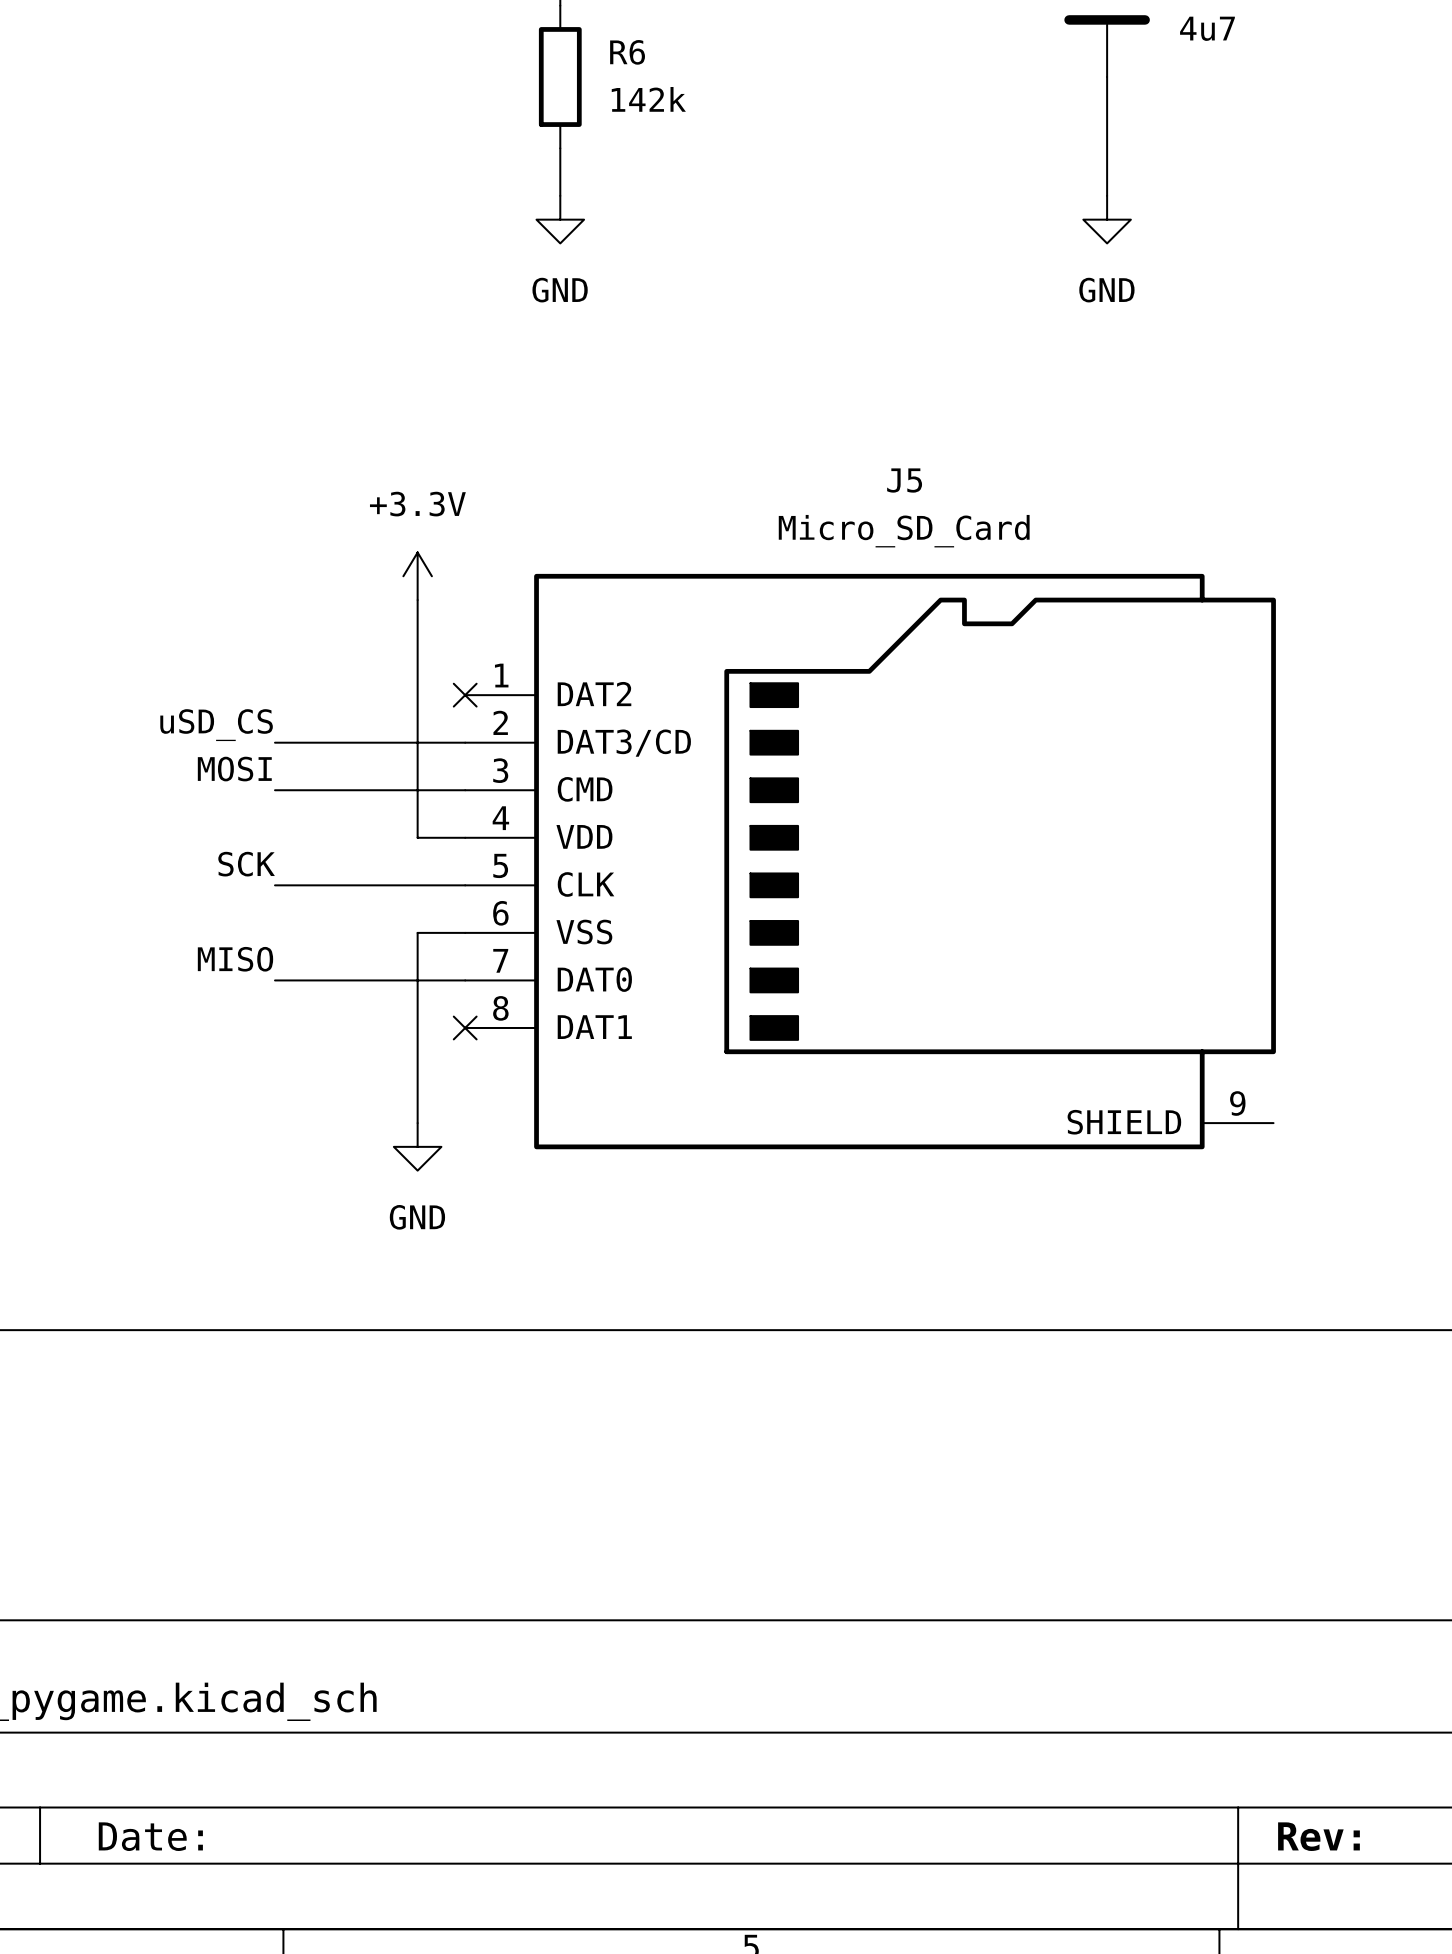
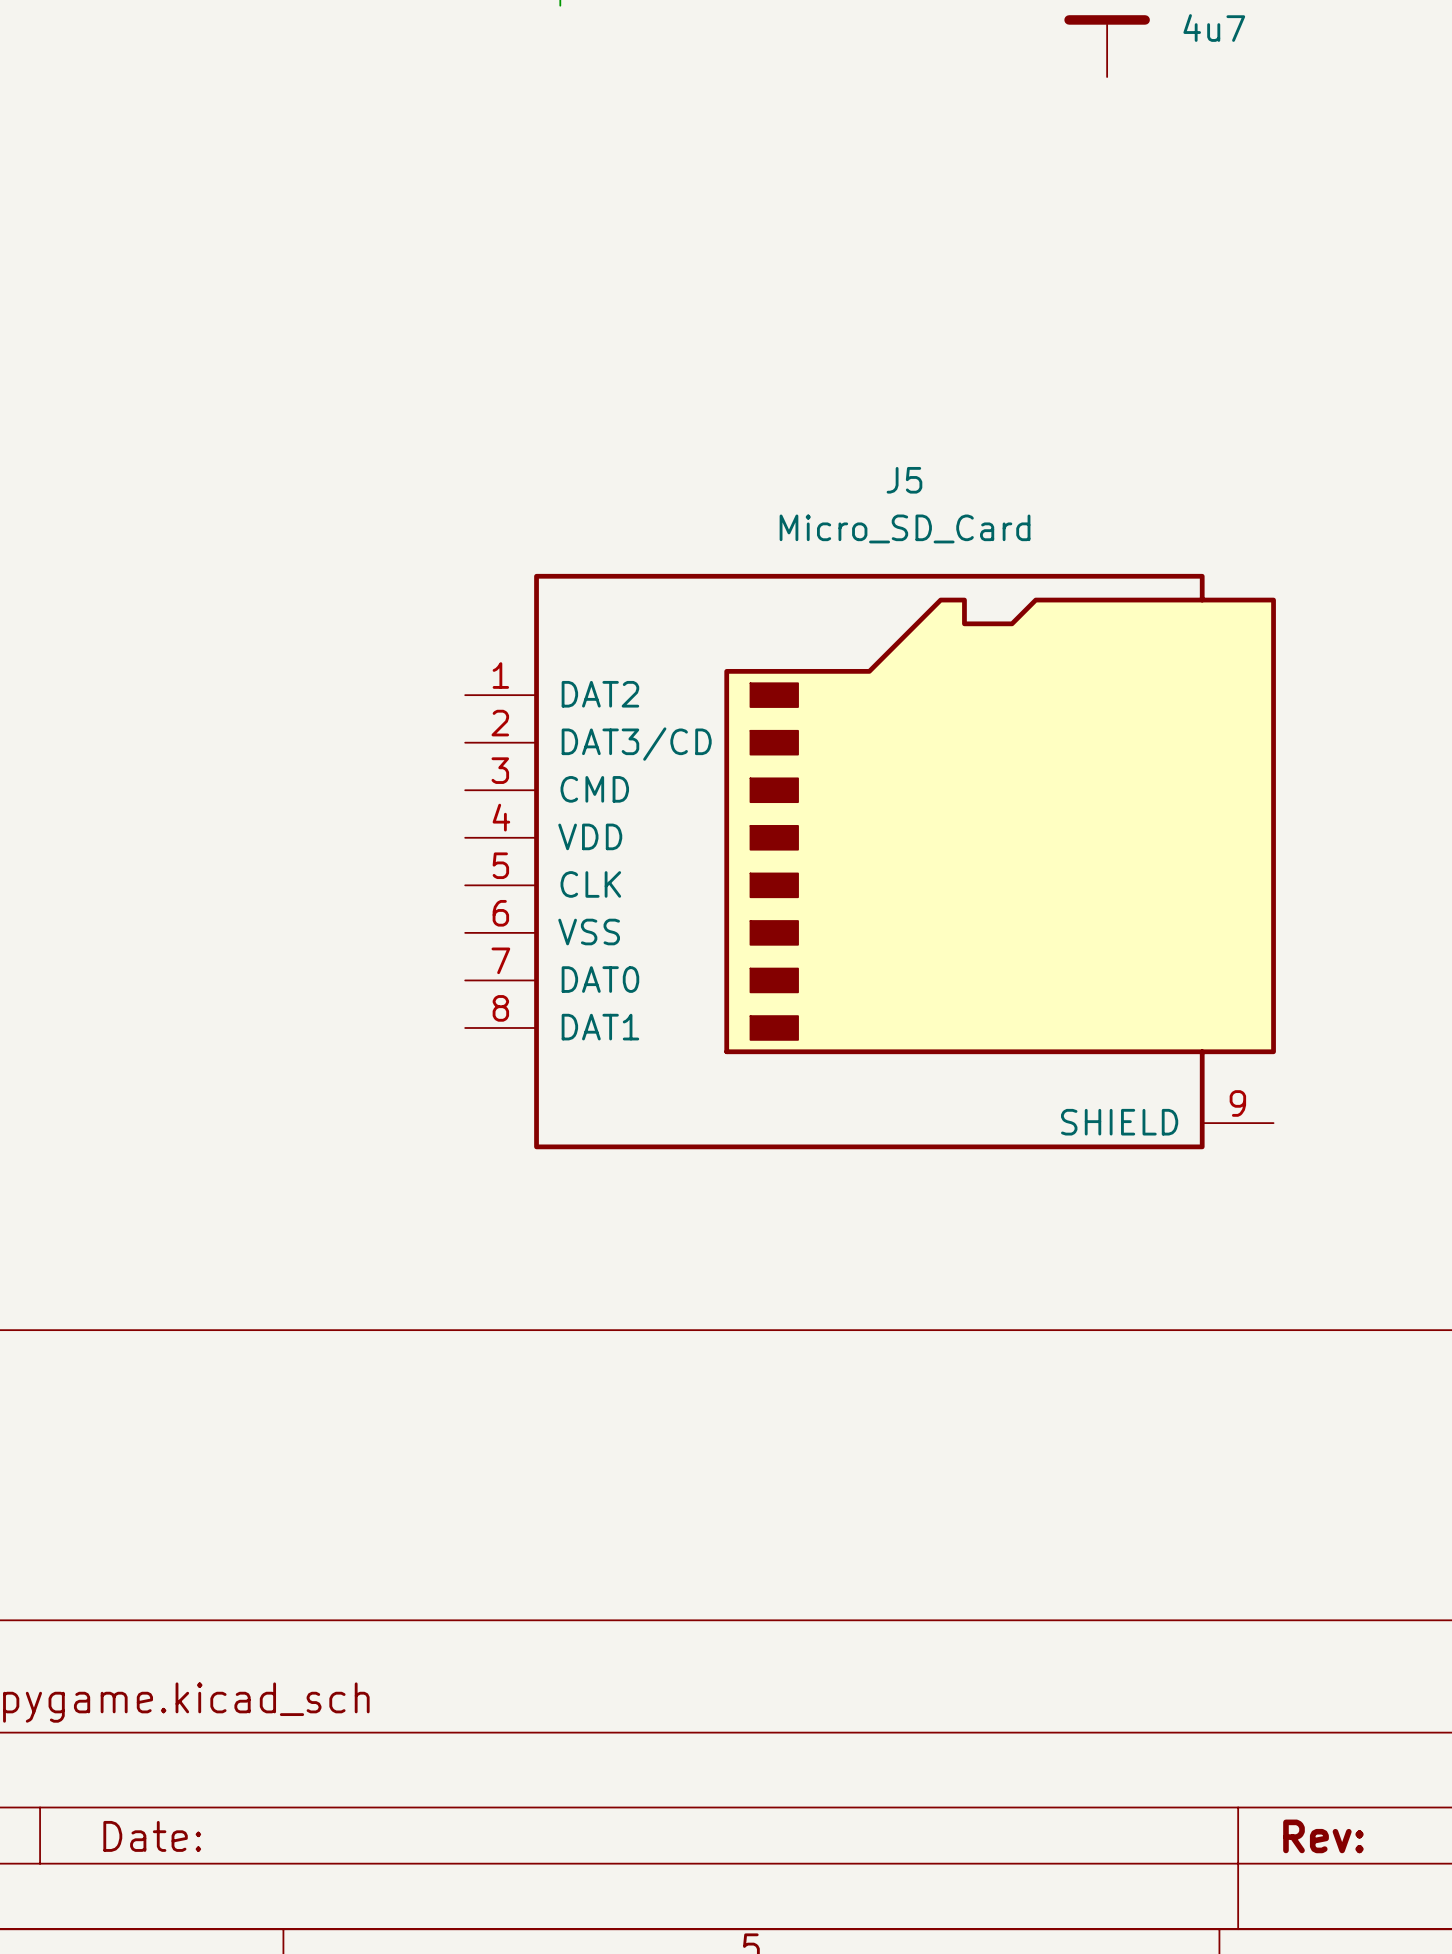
R6: 142k (560, 77) -> none
wire: (1107, 77) (1107, 195) -> none
wire: (560, 148) (560, 195) -> none
power symbol: GND (560, 219) -> none
power symbol: GND (1107, 219) -> none
power symbol: +3.3V (417, 576) -> none
wire: (417, 600) (417, 837) (465, 837) -> none
no-connect mark: (465, 695) -> none
label: uSD_CS (216, 725) -> none
wire: (275, 742) (465, 742) -> none
label: MOSI (234, 769) -> none
wire: (275, 790) (465, 790) -> none
label: SCK (246, 864) -> none
wire: (275, 885) (465, 885) -> none
wire: (465, 932) (417, 932) (417, 1123) -> none
label: MISO (235, 959) -> none
wire: (275, 980) (465, 980) -> none
no-connect mark: (465, 1027) -> none
power symbol: GND (417, 1146) -> none

